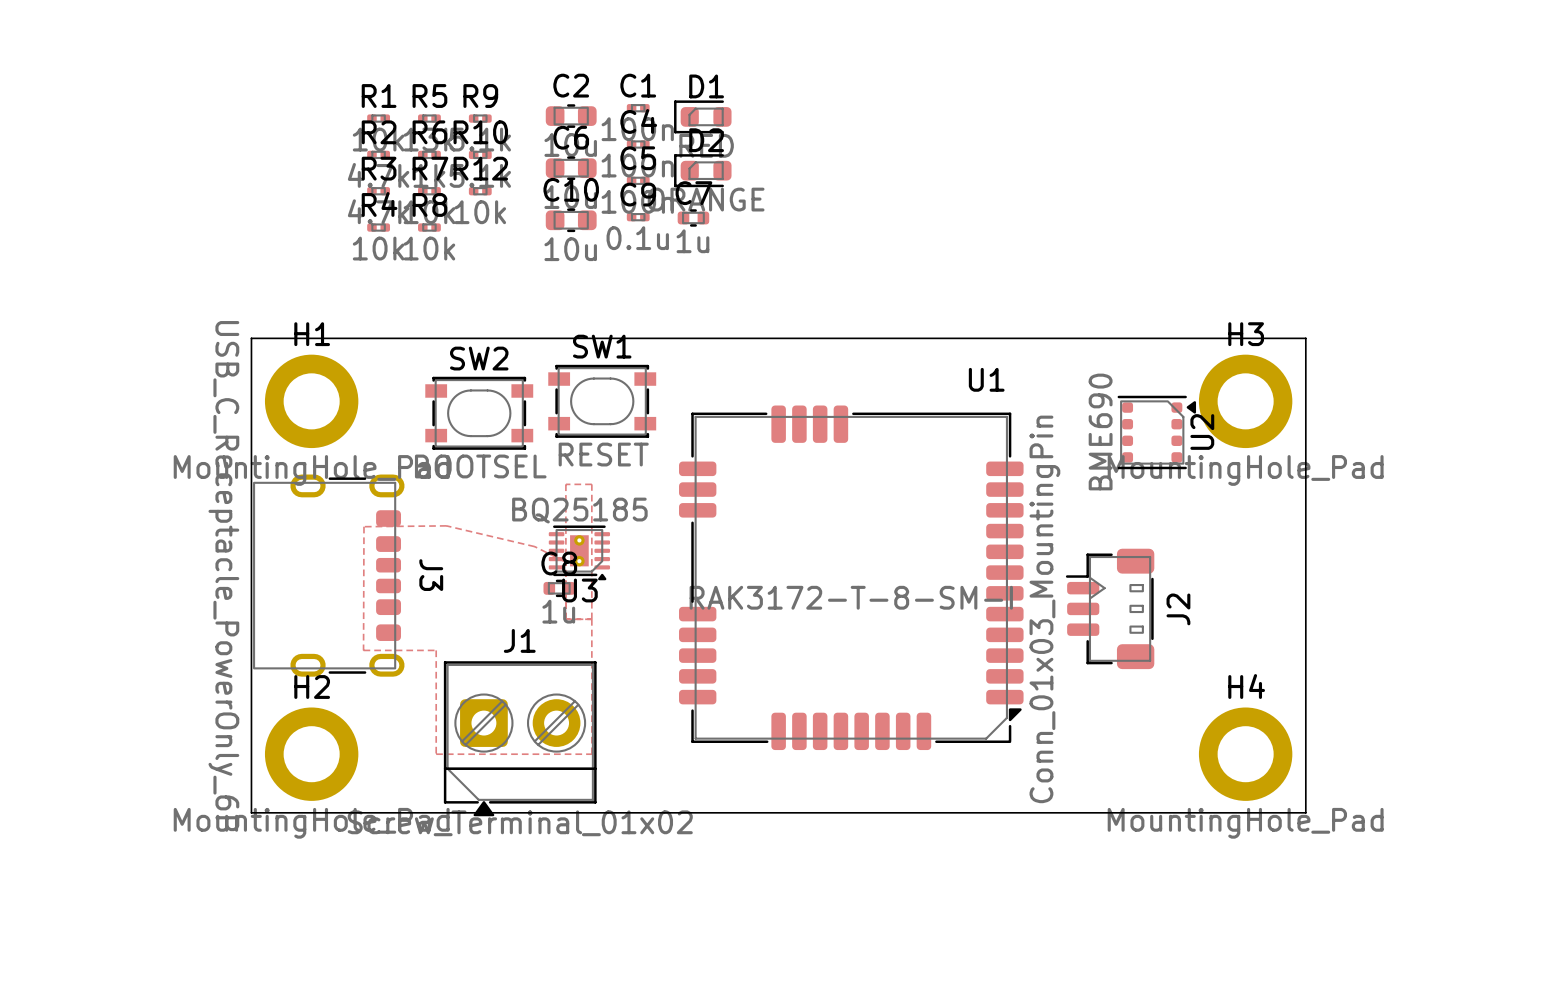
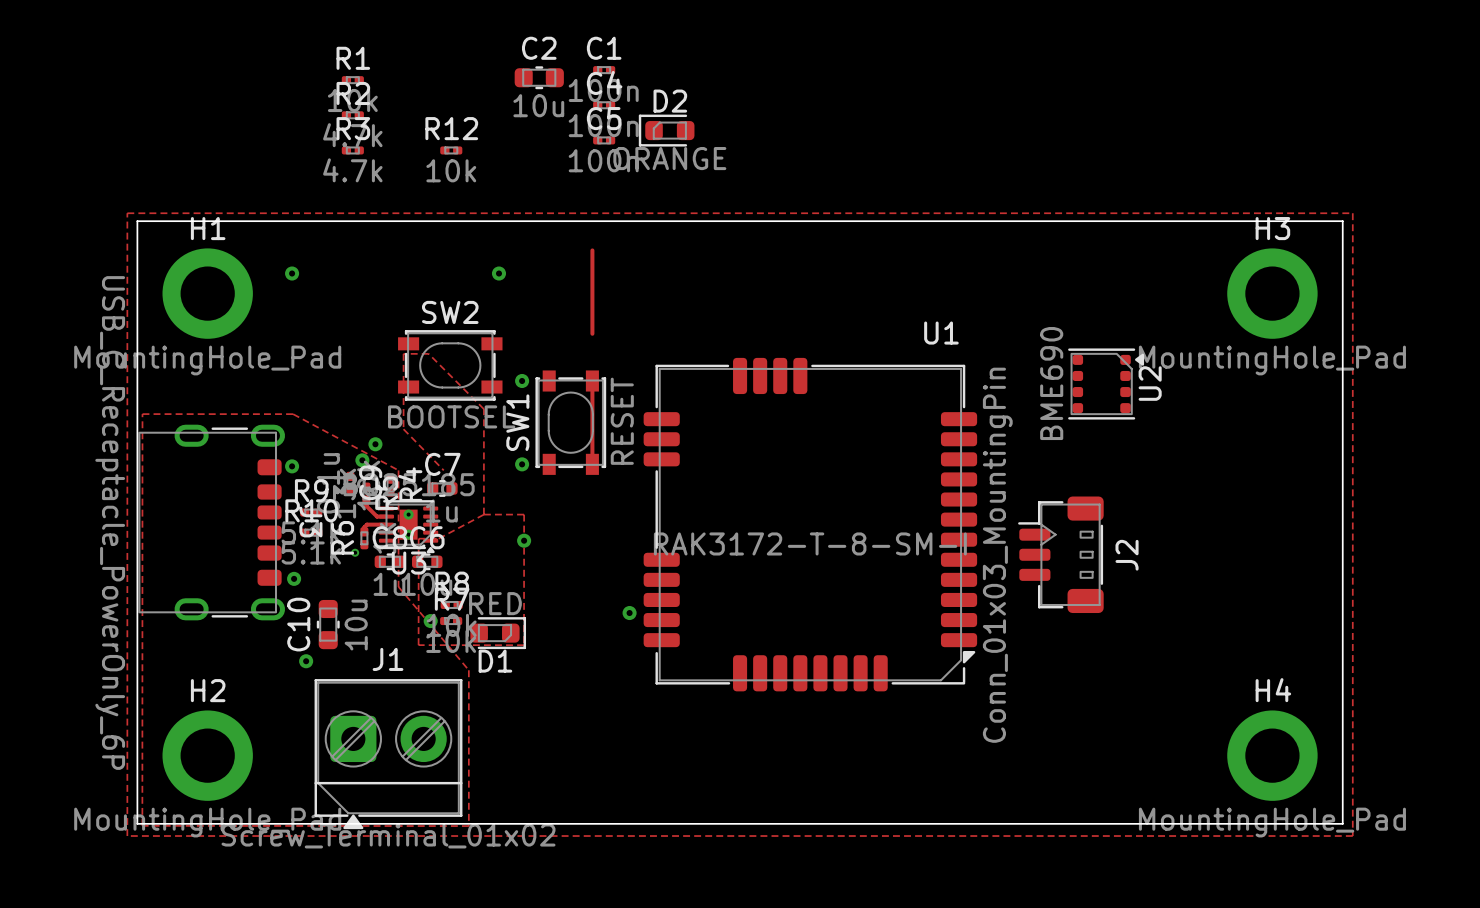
D1 rotation: 0° (702, 116) -> 180° (498, 633)
D1 position: (702, 116) -> (498, 633)
R5 rotation: 0° (429, 118) -> 90° clockwise (366, 493)
R5 position: (429, 118) -> (366, 493)
R9 position: (480, 118) -> (311, 512)
R6 rotation: 0° (429, 154) -> 90° clockwise (364, 538)
R6 position: (429, 154) -> (364, 538)
R10 position: (480, 154) -> (311, 532)
C6 footprint: [545, 156, 597, 181] -> [412, 553, 443, 571]
C10 name position: C10 (571, 189) -> C10 (298, 624)
R7 position: (429, 191) -> (451, 621)
C9 rotation: 0° (638, 217) -> 90° clockwise (350, 482)
C9 position: (638, 217) -> (350, 482)
C7 position: (693, 217) -> (442, 488)
C10 rotation: 0° (571, 220) -> 90° clockwise (328, 624)
C10 position: (571, 220) -> (328, 624)
R4 rotation: 0° (378, 227) -> 90° clockwise (390, 485)
R4 position: (378, 227) -> (390, 485)
R8 position: (429, 227) -> (451, 604)
C10 value position: 10u (570, 249) -> 10u (356, 625)
zone outline: none -> (127, 213) (1352, 213) (1352, 836) (127, 836) (127, 213)
track: none -> (592, 250) (592, 333)
via: none -> (292, 273)
via: none -> (498, 273)
board edge: (251, 338) (1305, 338) (1305, 812) (251, 812) (251, 338) -> (137, 221) (137, 823) (1342, 823) (1342, 221) (137, 221)
SW1 name position: SW1 (602, 346) -> SW1 (517, 422)
H1 position: (311, 401) -> (207, 293)
SW1 rotation: 0° (602, 401) -> 90° clockwise (570, 422)
SW1 position: (602, 401) -> (570, 422)
H3 position: (1245, 401) -> (1272, 293)
via: none -> (522, 380)
track: none -> (592, 380) (592, 464)
SW1 value position: RESET (603, 454) -> RESET (622, 421)
zone outline: none -> (142, 414) (142, 825) (468, 826) (468, 670) (398, 586) (398, 470) (293, 414) (142, 414)
via: none -> (375, 444)
via: none -> (362, 460)
via: none -> (522, 464)
via: none -> (292, 466)
zone outline: none -> (443, 470) (403, 429) (403, 353) (428, 353) (483, 409) (483, 514)
track: none -> (366, 500) (366, 505) (377, 516) (386, 516)
U3 position: (579, 552) -> (408, 526)
zone outline: (565, 562) (534, 546) (446, 525) (363, 526) (363, 650) (436, 650) (436, 754) (591, 754) (591, 484) (565, 484) (565, 619) (591, 619) -> none
zone outline: none -> (483, 514) (524, 514) (524, 645) (418, 645) (418, 538) (438, 538) (483, 514)
J3 position: (328, 575) -> (211, 522)
track: none -> (386, 524) (367, 524) (364, 527) (364, 531)
C8 position: (559, 588) -> (389, 561)
via: none -> (524, 540)
via: none -> (355, 552)
via: none -> (294, 578)
via: none -> (629, 613)
via: none -> (430, 621)
via: none -> (306, 661)
J1 position: (520, 738) -> (388, 754)
H2 position: (311, 754) -> (207, 755)
H4 position: (1245, 754) -> (1272, 755)

